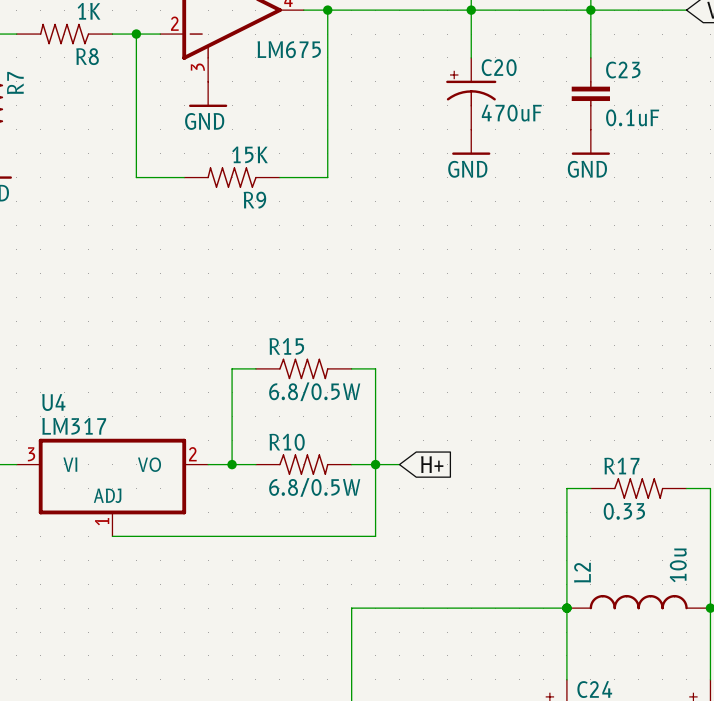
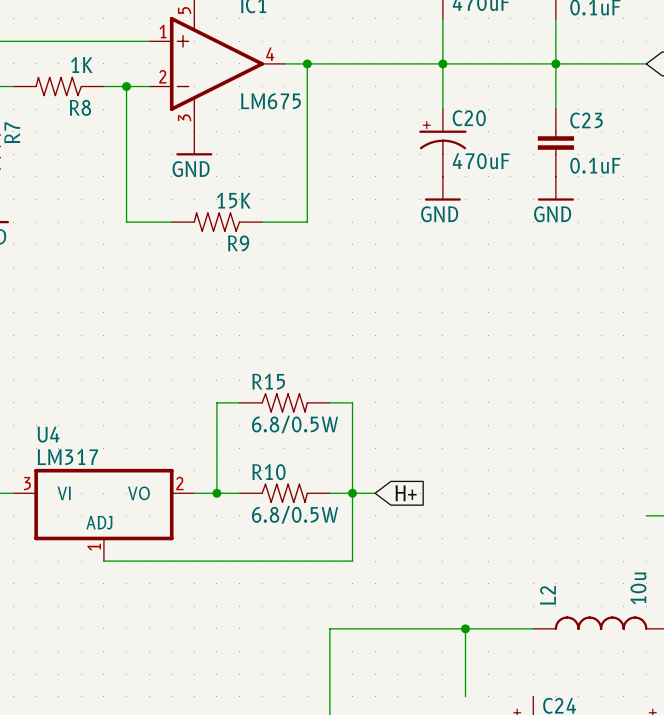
wire: (590, 488) (566, 488) (566, 679) -> none
R17: 0.33 (638, 488) -> none
wire: none -> (465, 628) (465, 696)
junction: none -> (465, 628)
junction: (566, 608) -> none

